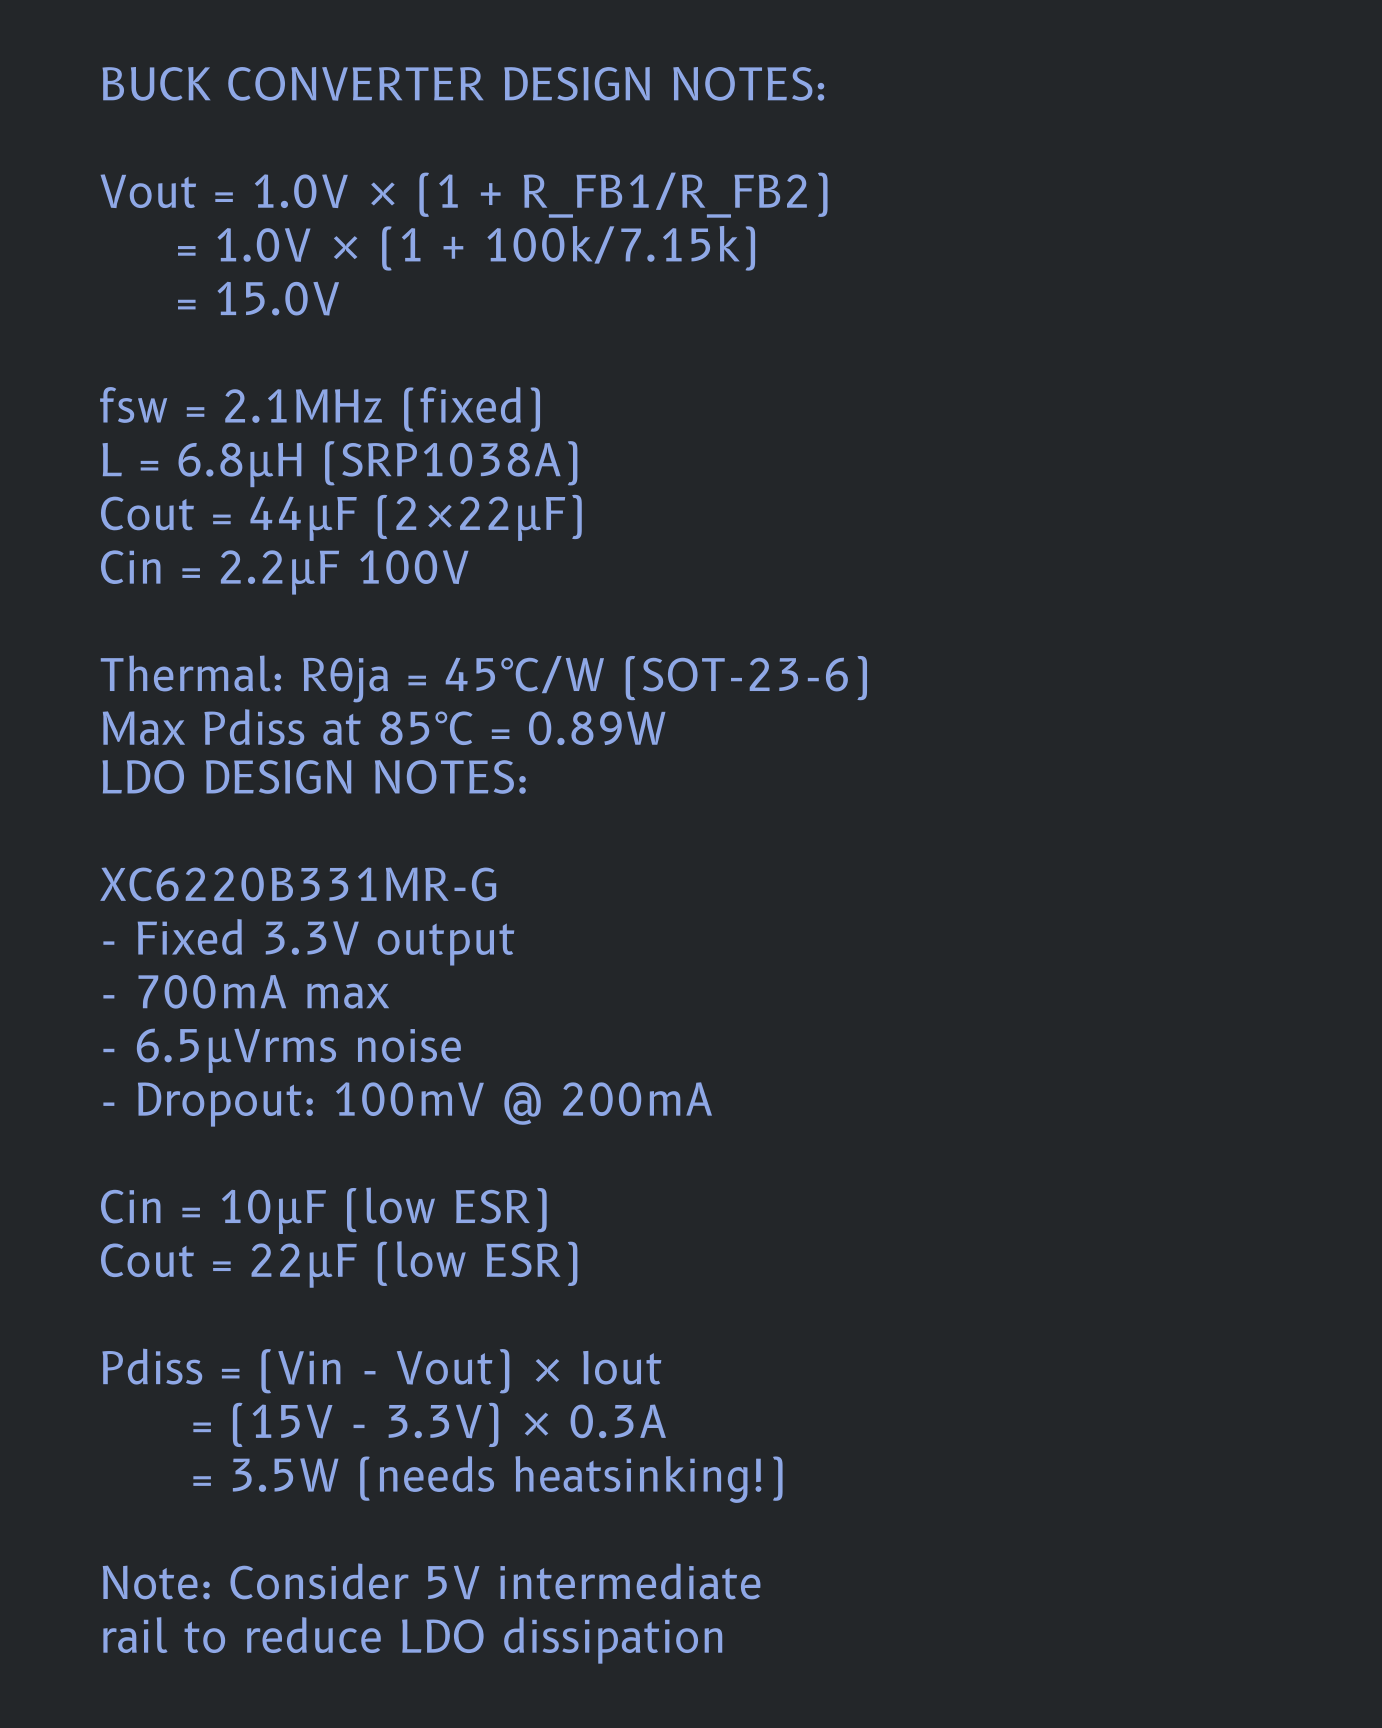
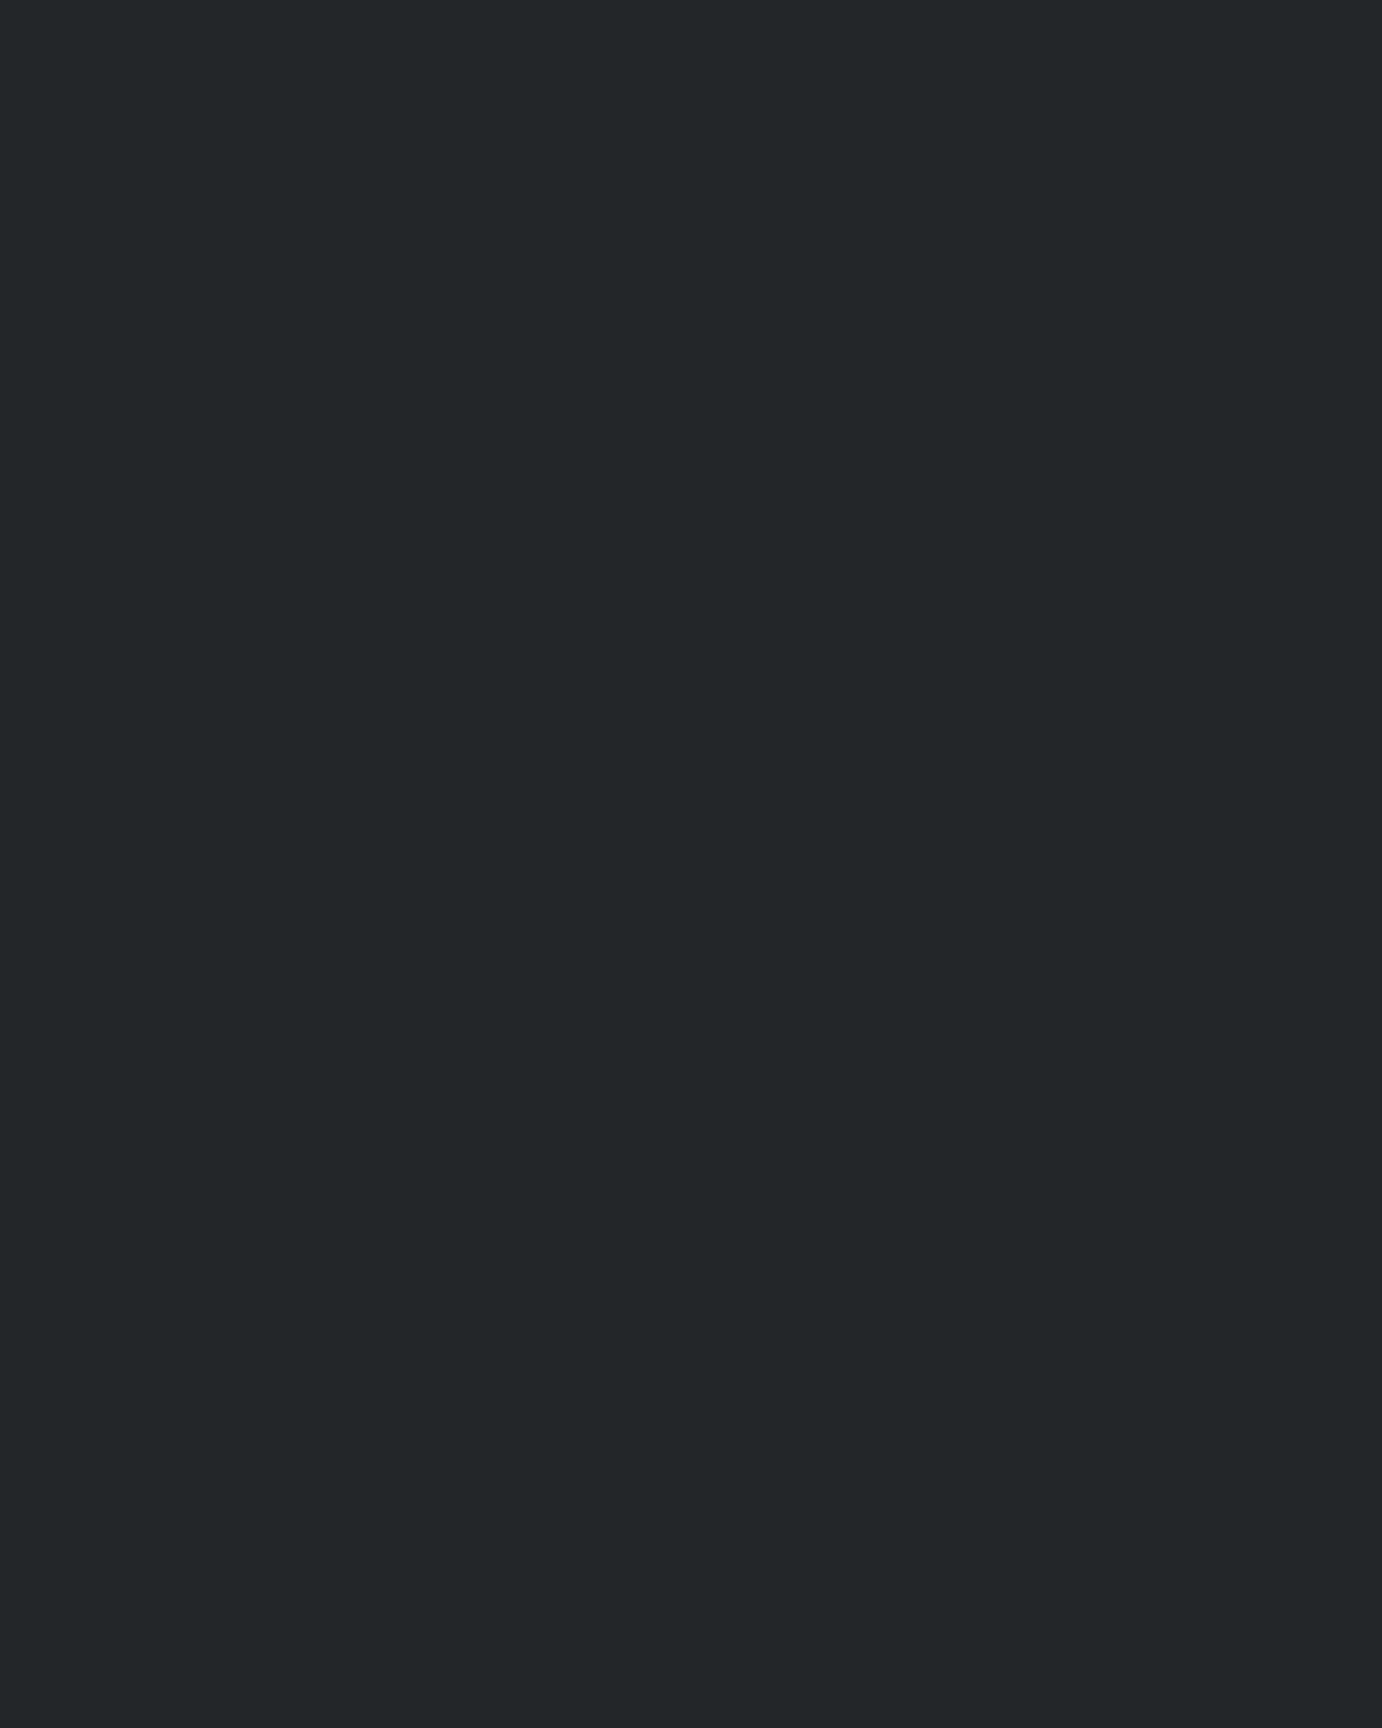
text: BUCK CONVERTER DESIGN NOTES: (463, 83) -> none
text: Vout = 1.0V × (1 + R_FB1/R_FB2) (464, 195) -> none
text: = 1.0V × (1 + 100k/7.15k) (466, 248) -> none
text: = 15.0V (258, 298) -> none
text: fsw = 2.1MHz (fixed) (320, 409) -> none
text: L = 6.8µH (SRP1038A) (339, 464) -> none
text: Cout = 44µF (2×22µF) (341, 517) -> none
text: Cin = 2.2µF 100V (284, 572) -> none
text: Thermal: Rθja = 45°C/W (SOT-23-6) (483, 678) -> none
text: Max Pdiss at 85°C = 0.89W (384, 727) -> none
text: LDO DESIGN NOTES: (314, 776) -> none
text: XC6220B331MR-G (298, 884) -> none
text: - Fixed 3.3V output (308, 942) -> none
text: - 700mA max (246, 991) -> none
text: - 6.5µVrms noise (282, 1050) -> none
text: - Dropout: 100mV @ 200mA (407, 1104) -> none
text: Cin = 10µF (low ESR) (323, 1210) -> none
text: Cout = 22µF (low ESR) (339, 1264) -> none
text: Pdiss = (Vin - Vout) × Iout (381, 1371) -> none
text: = (15V - 3.3V) × 0.3A (429, 1424) -> none
text: = 3.5W (needs heatsinking!) (487, 1479) -> none
text: Note: Consider 5V intermediate (431, 1581) -> none
text: rail to reduce LDO dissipation (412, 1640) -> none

